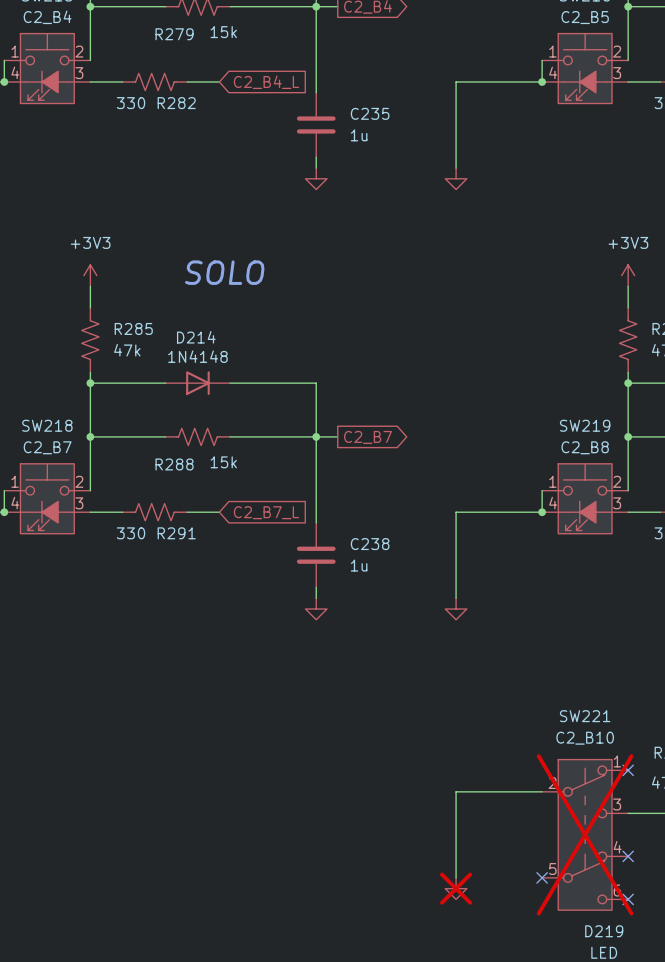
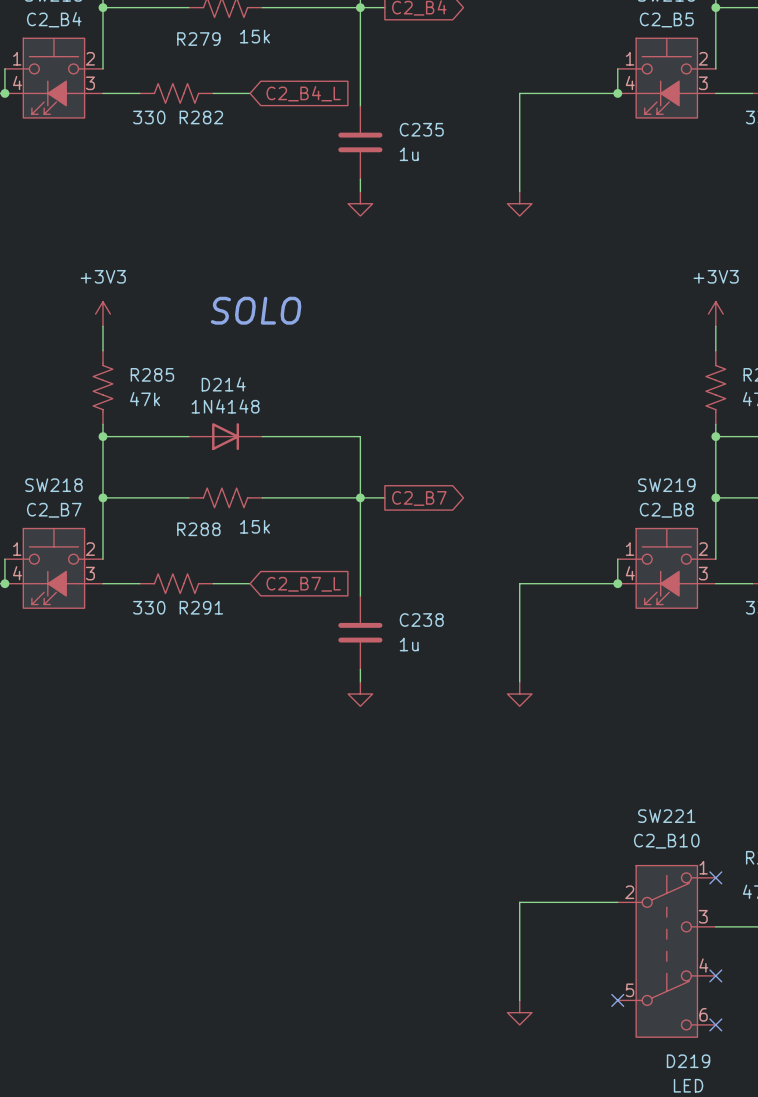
SW221 do-not-place cross: (585, 834) -> none
power symbol do-not-place cross: (456, 888) -> none

